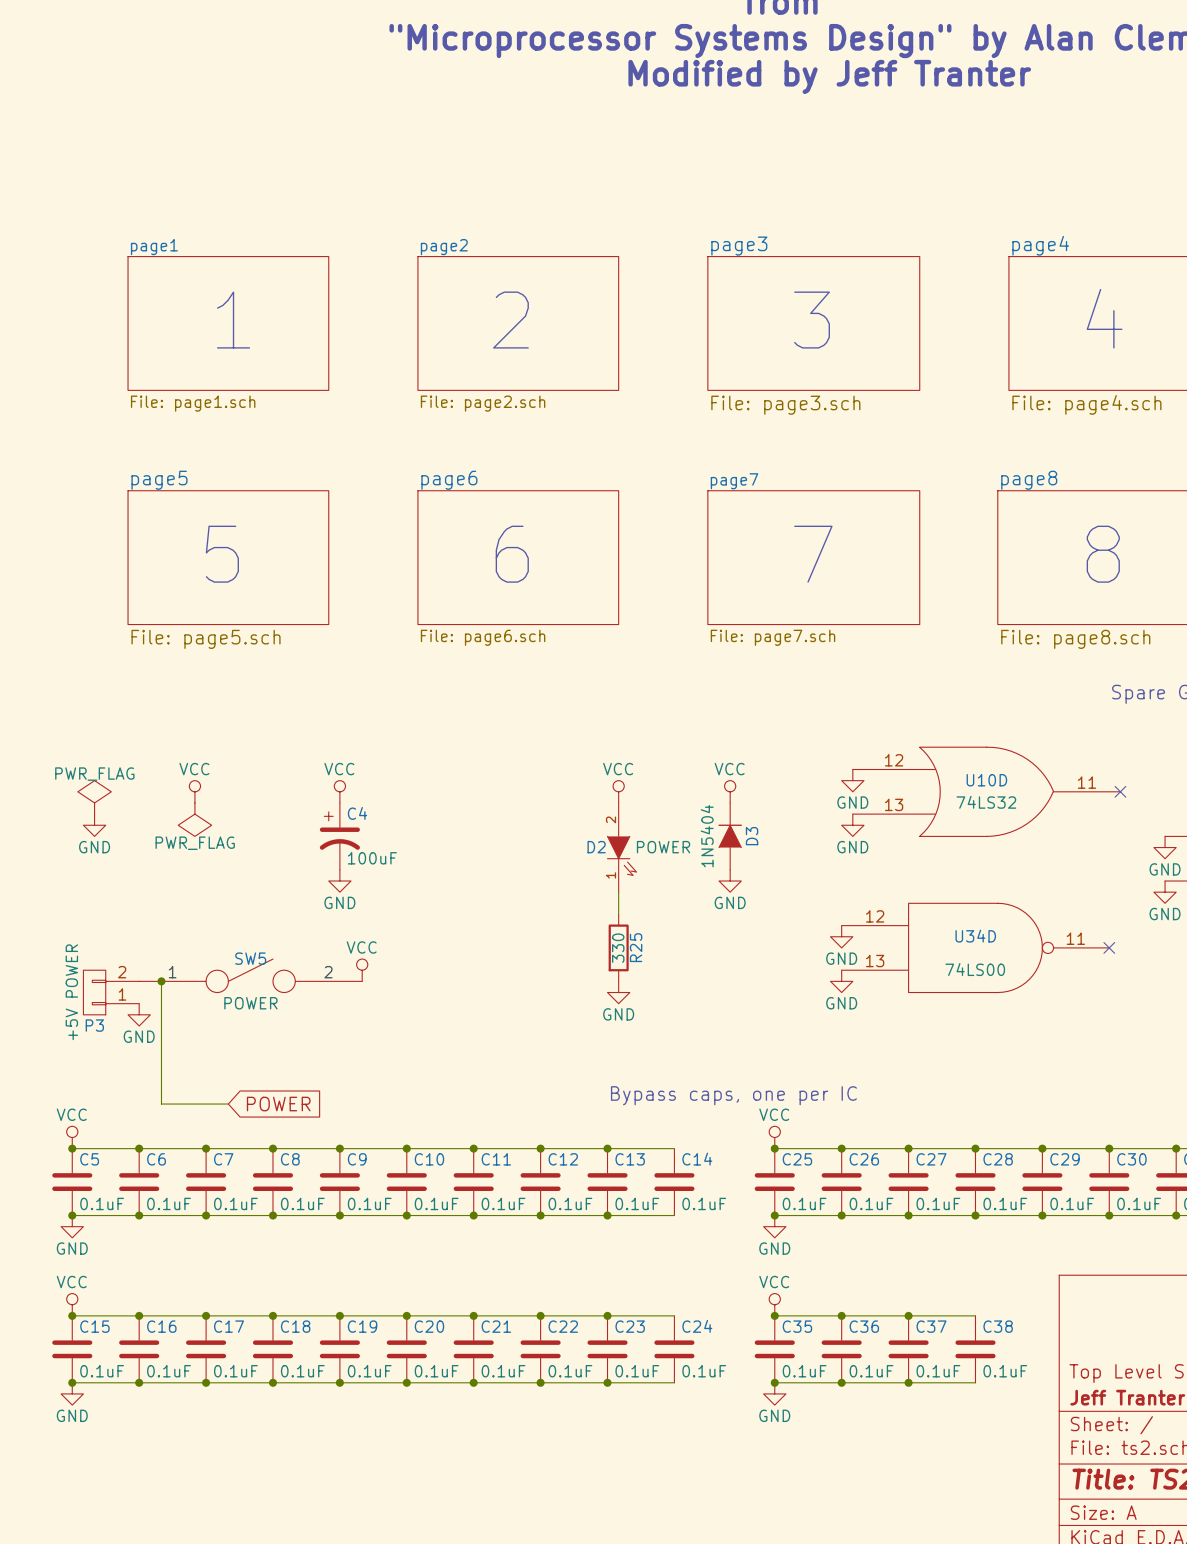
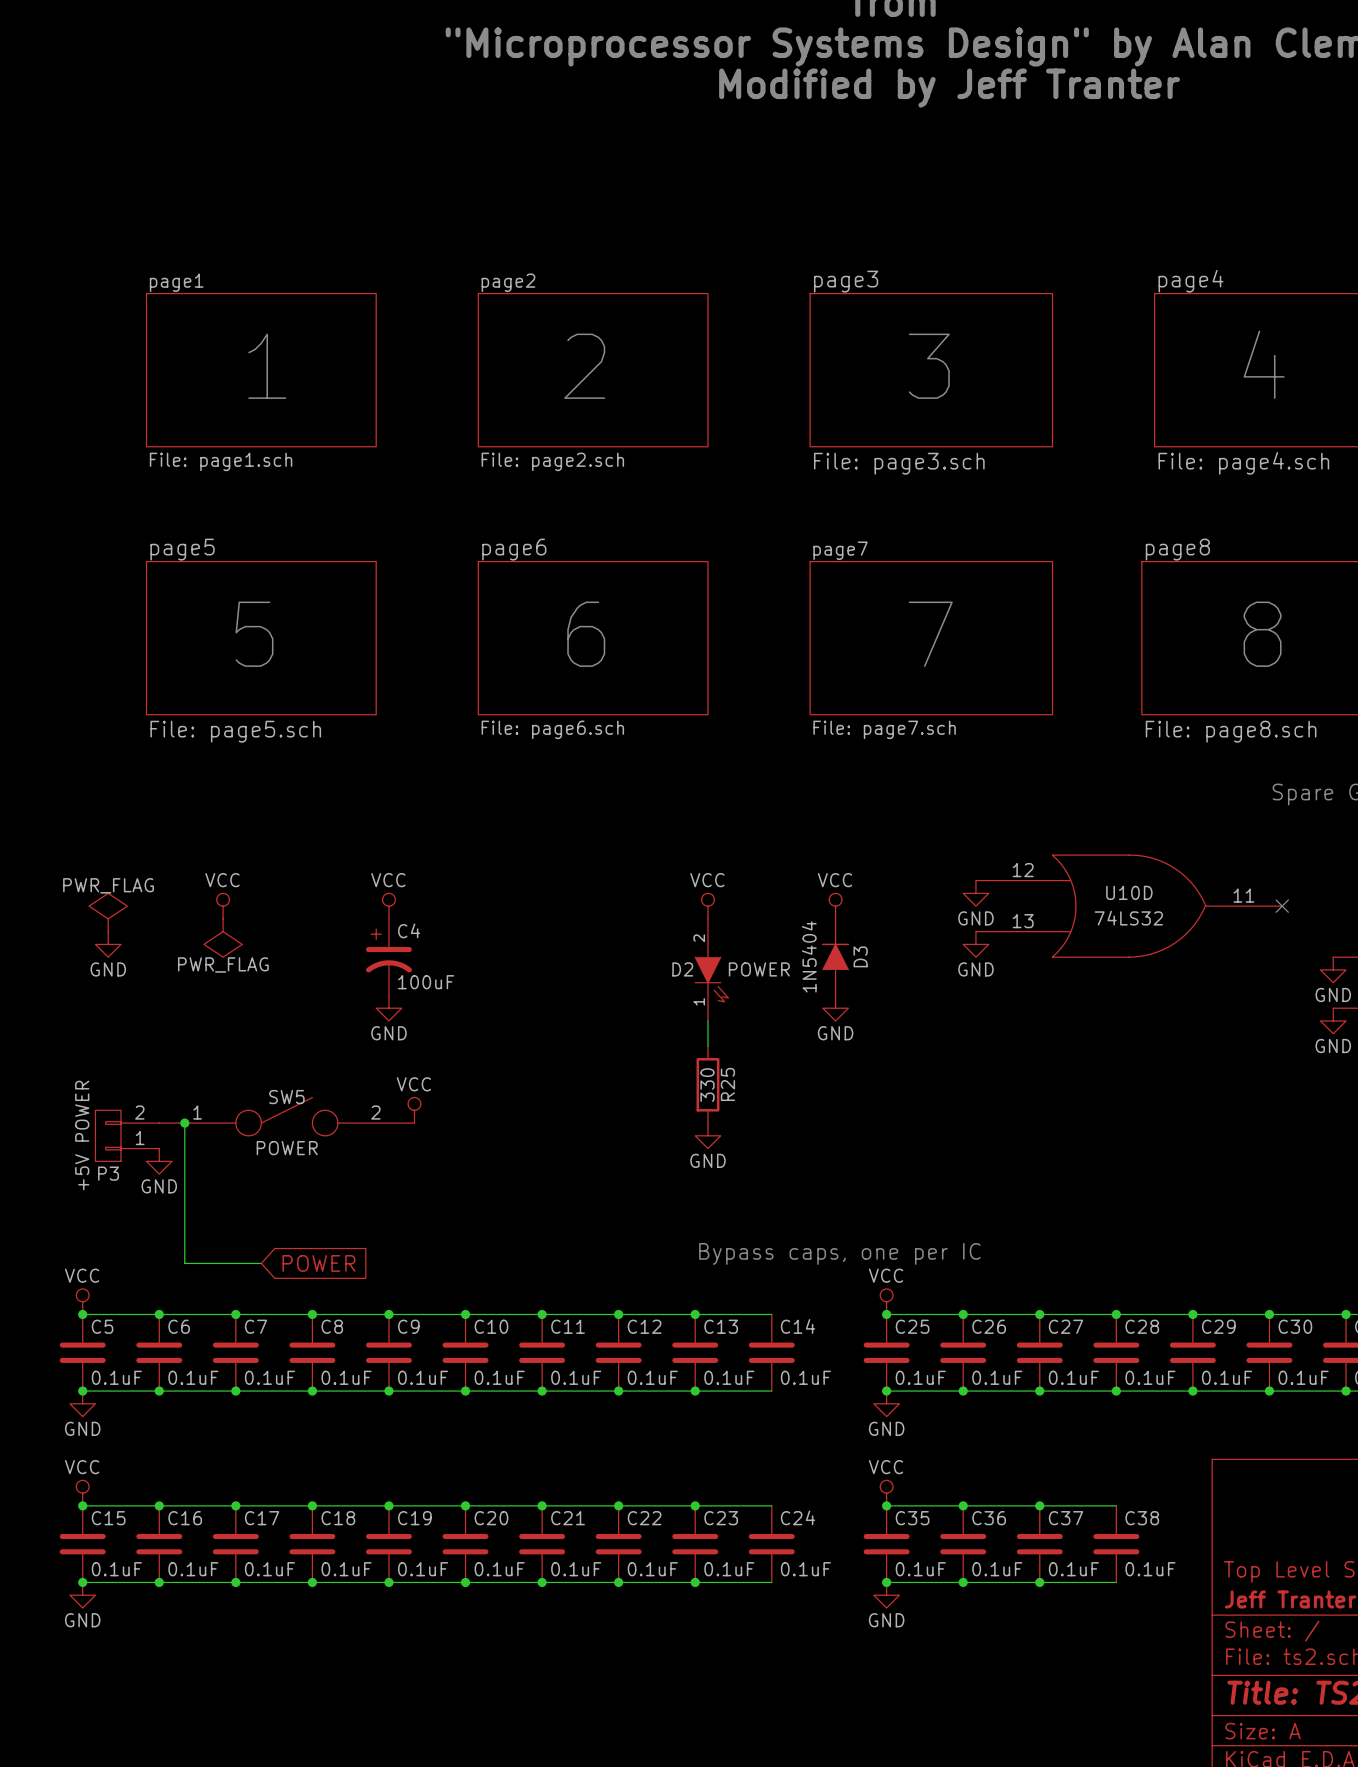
power symbol: GND (841, 936) -> none
U34D: 74LS00 (975, 947) -> none
no-connect mark: (1109, 947) -> none
power symbol: GND (841, 981) -> none

